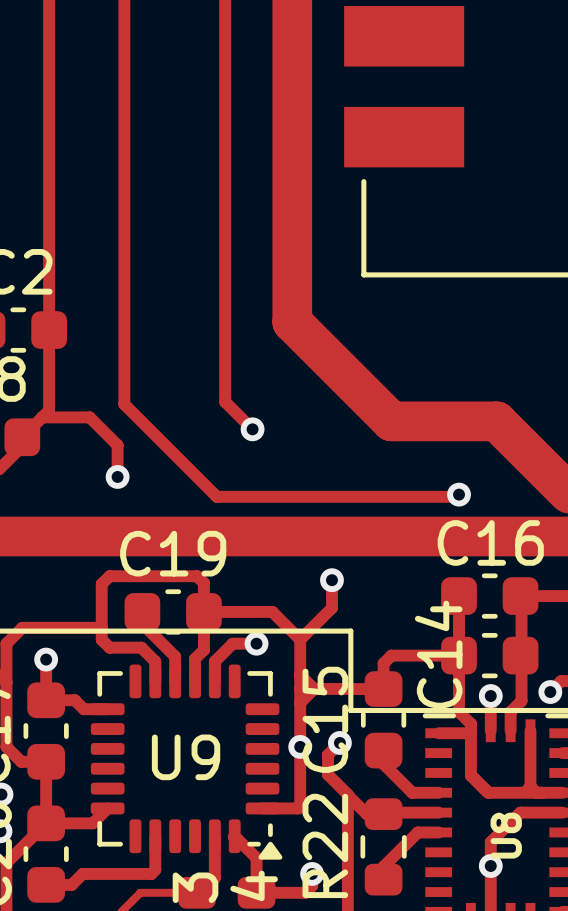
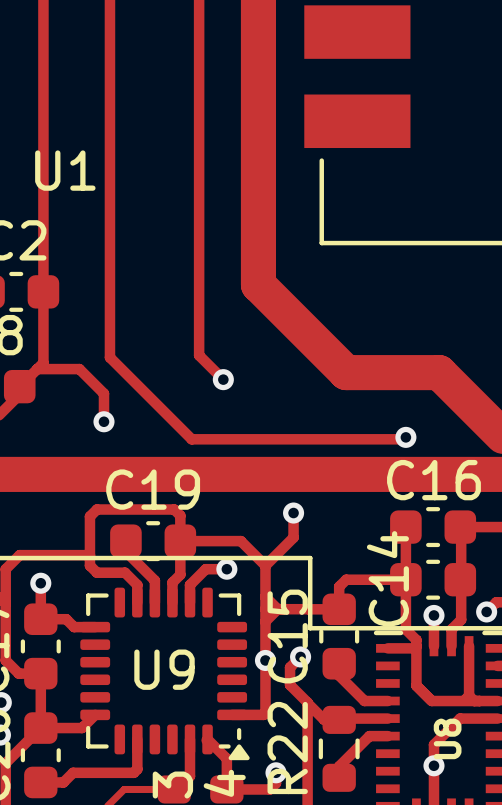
U1 name: none -> U1 (65, 170)

